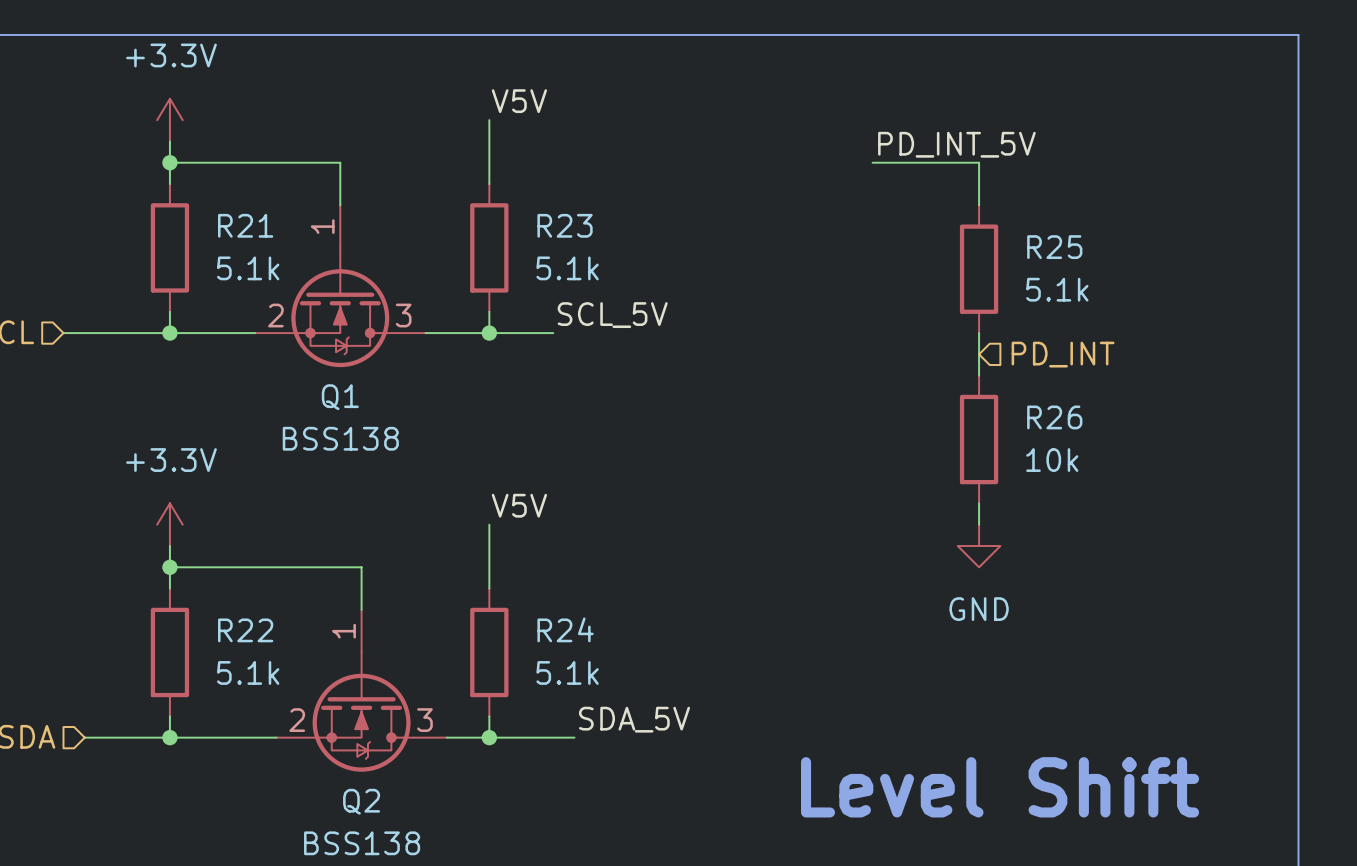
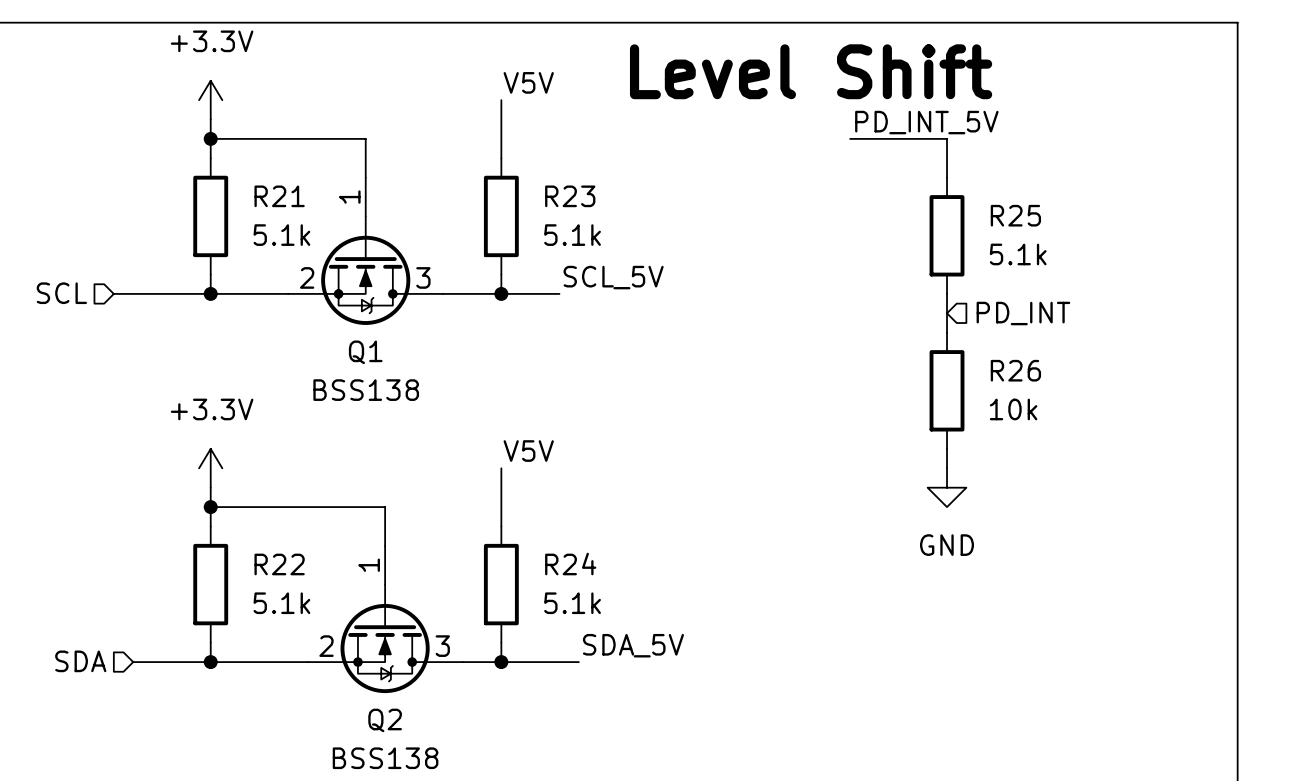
text: none -> Level Shift (811, 71)
text: Level Shift (1000, 787) -> none

